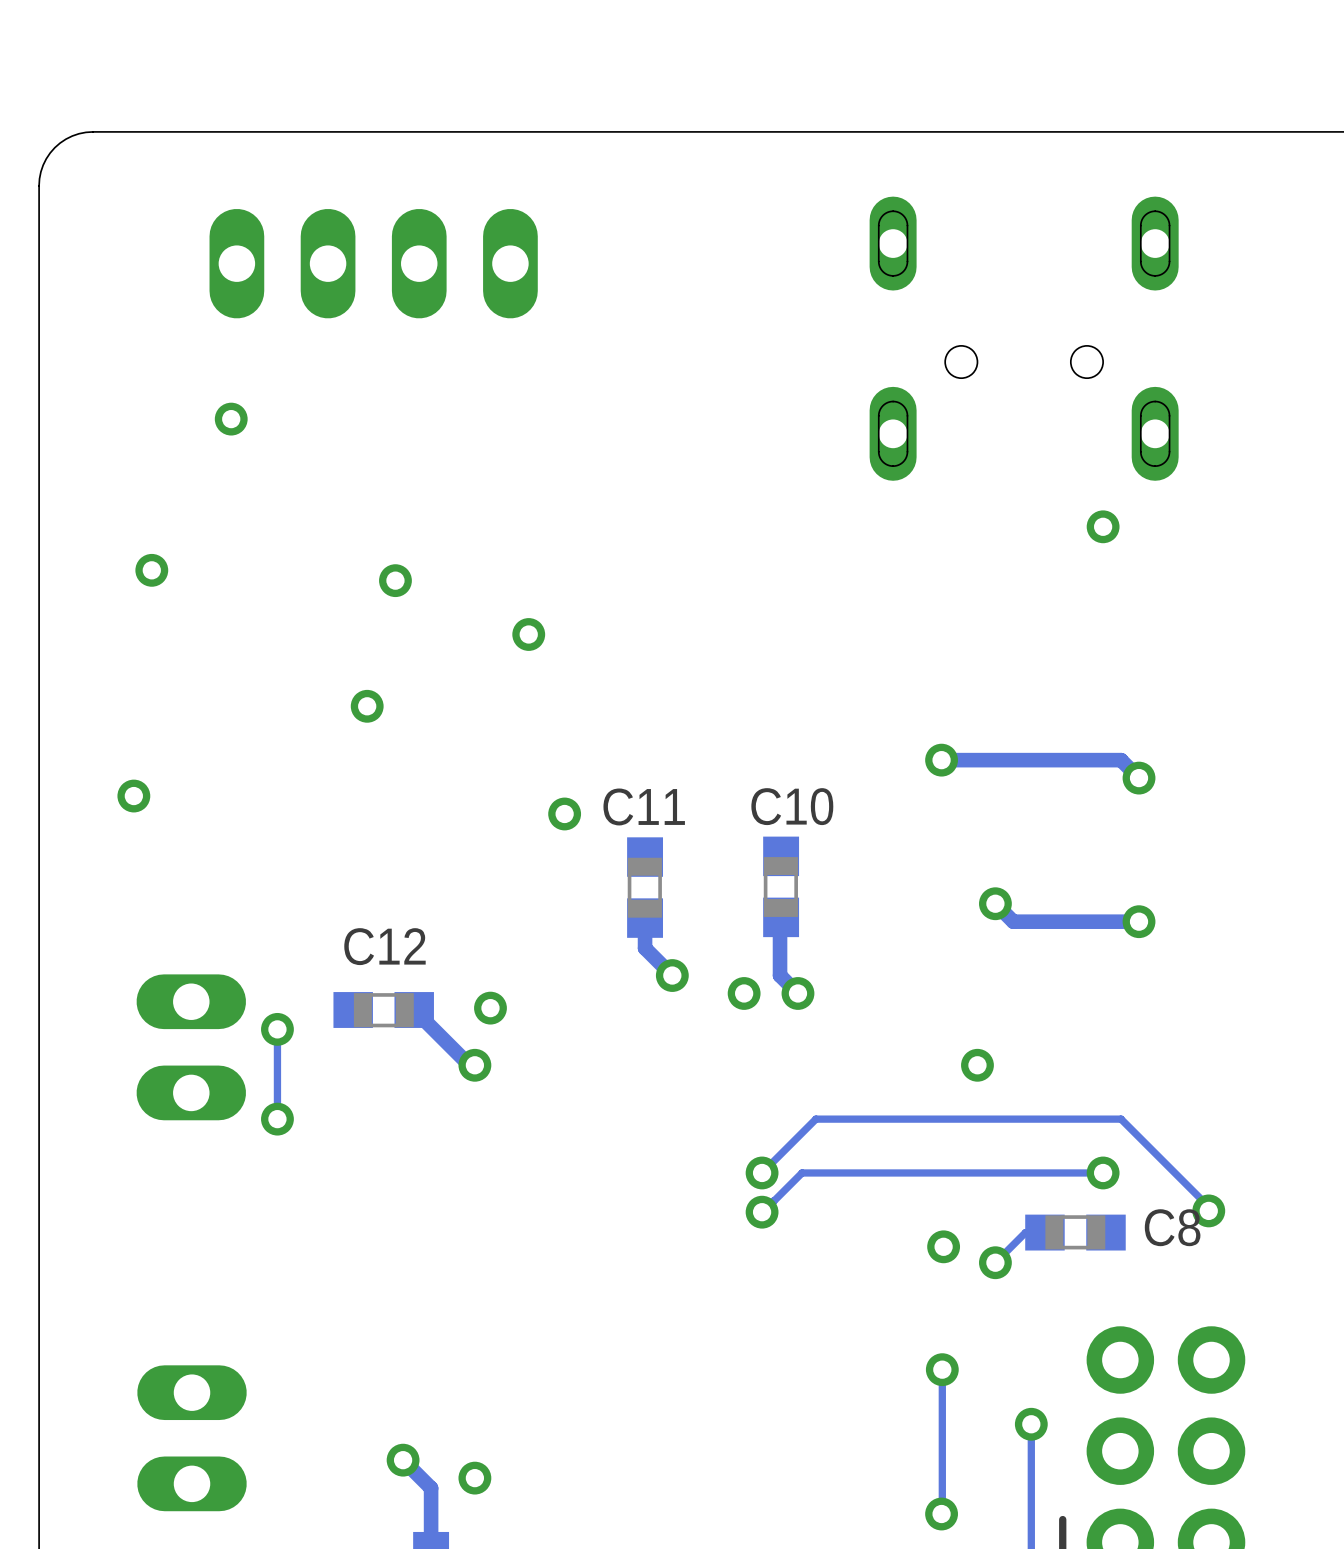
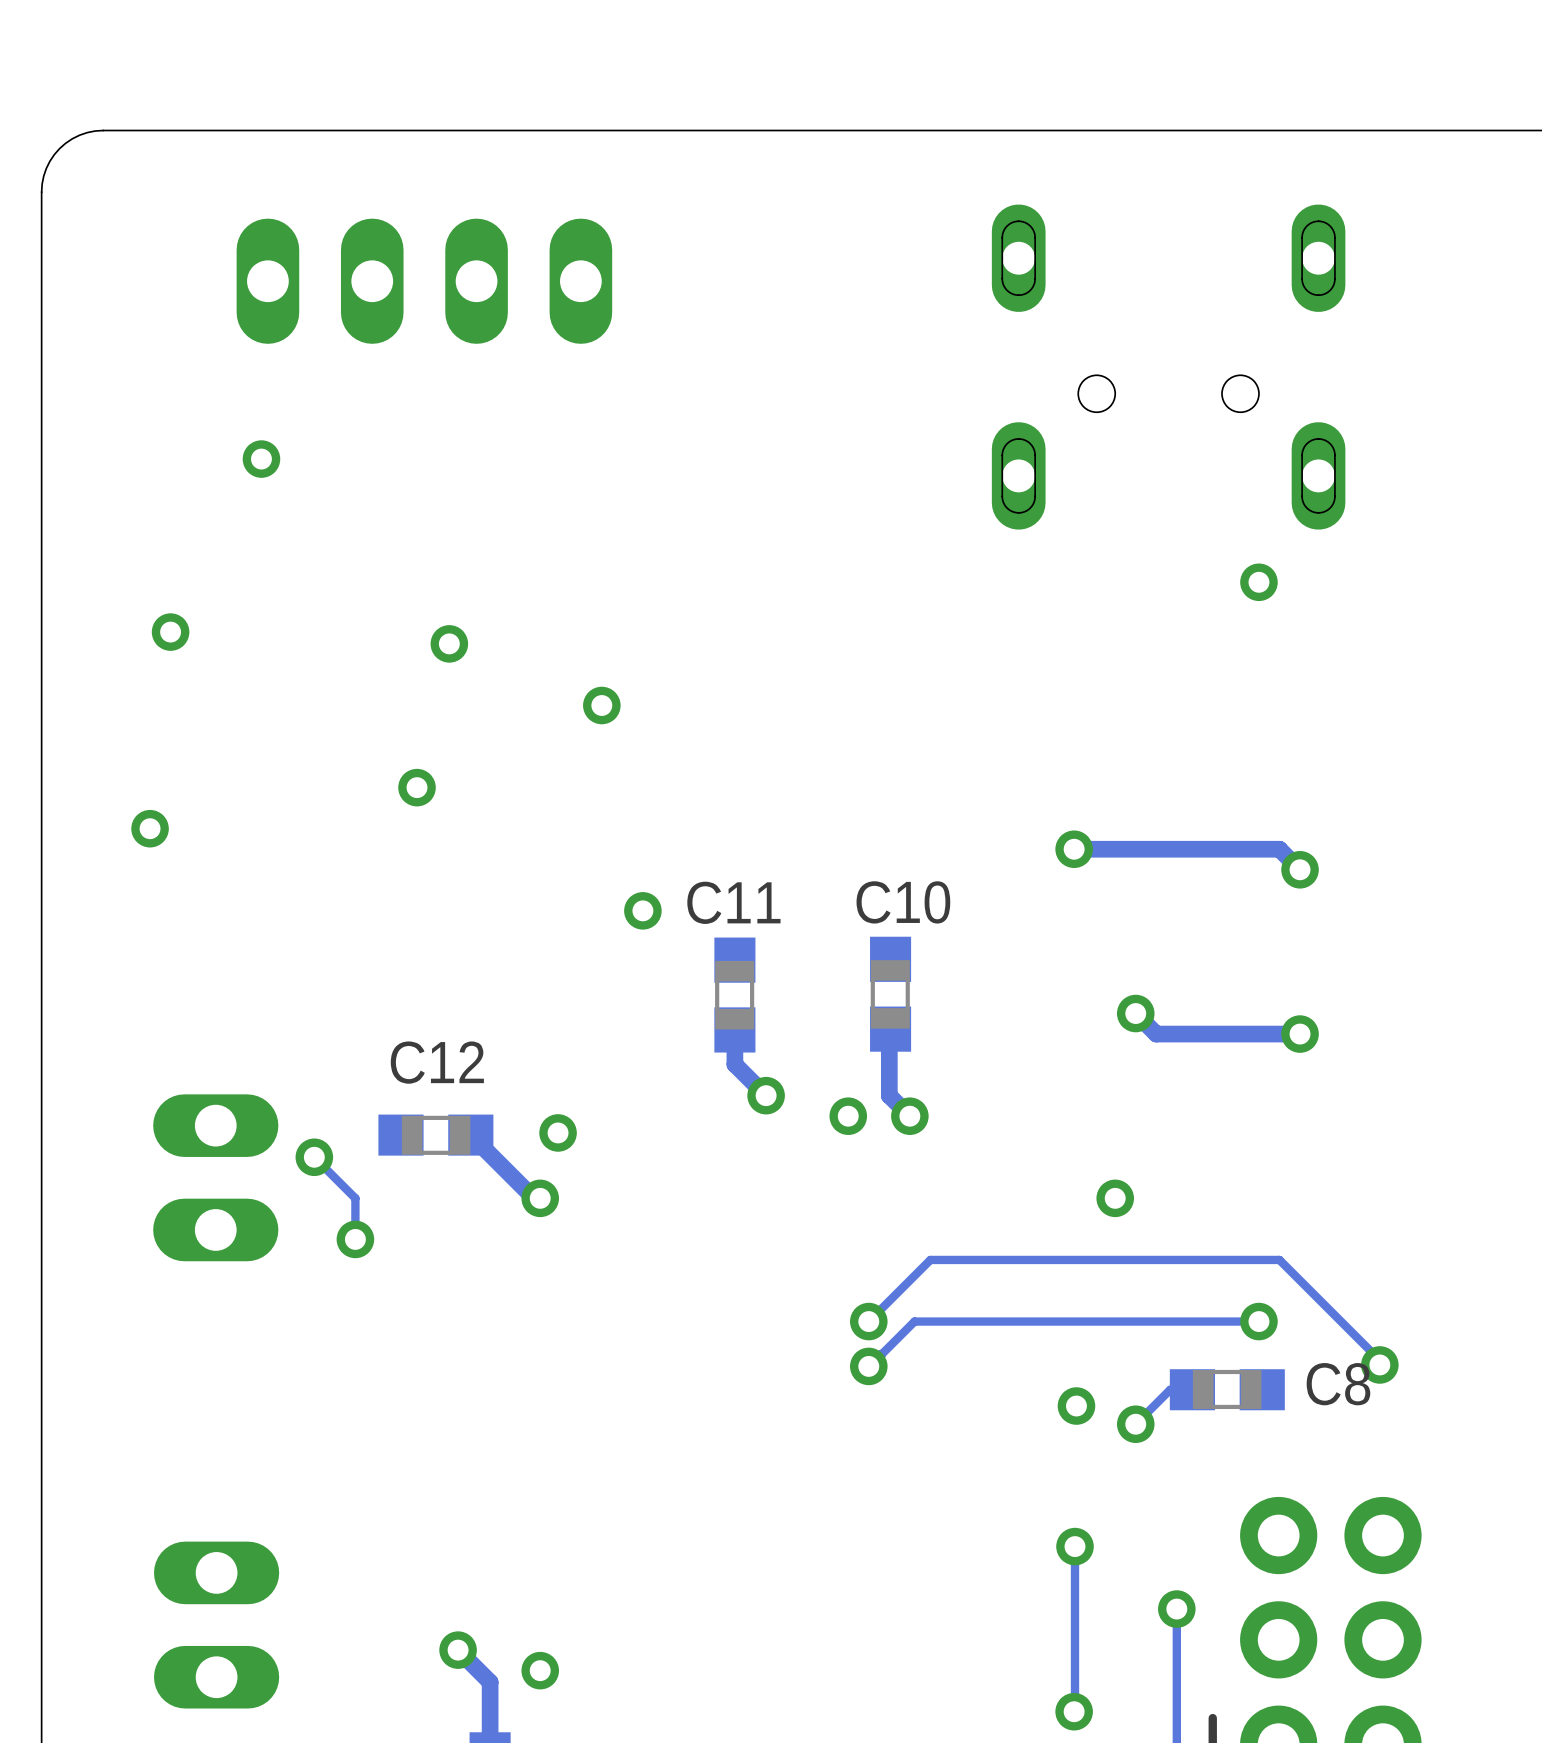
via position: (133, 796) -> (150, 828)
track: (277, 1029) (277, 1119) -> (314, 1157) (355, 1198) (355, 1239)
via position: (277, 1119) -> (355, 1239)

